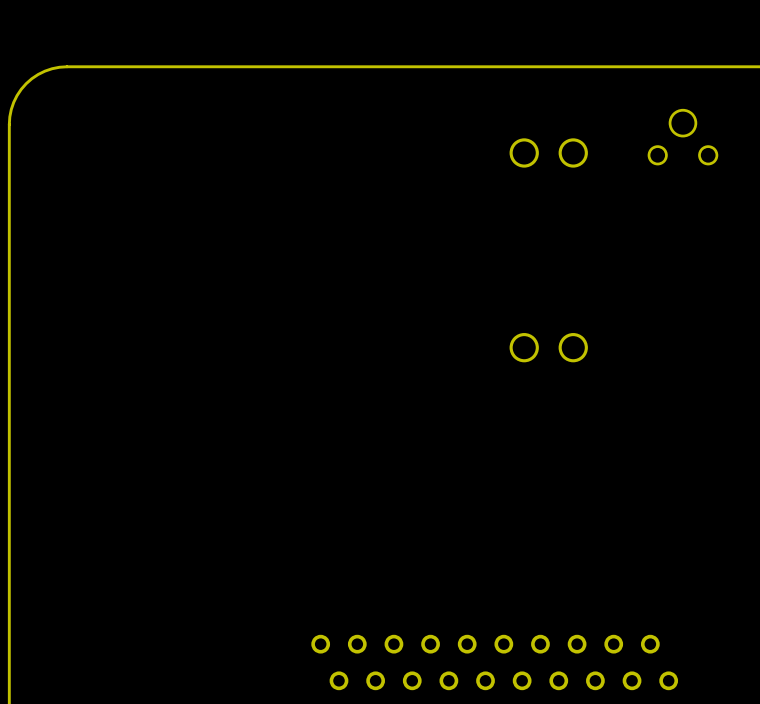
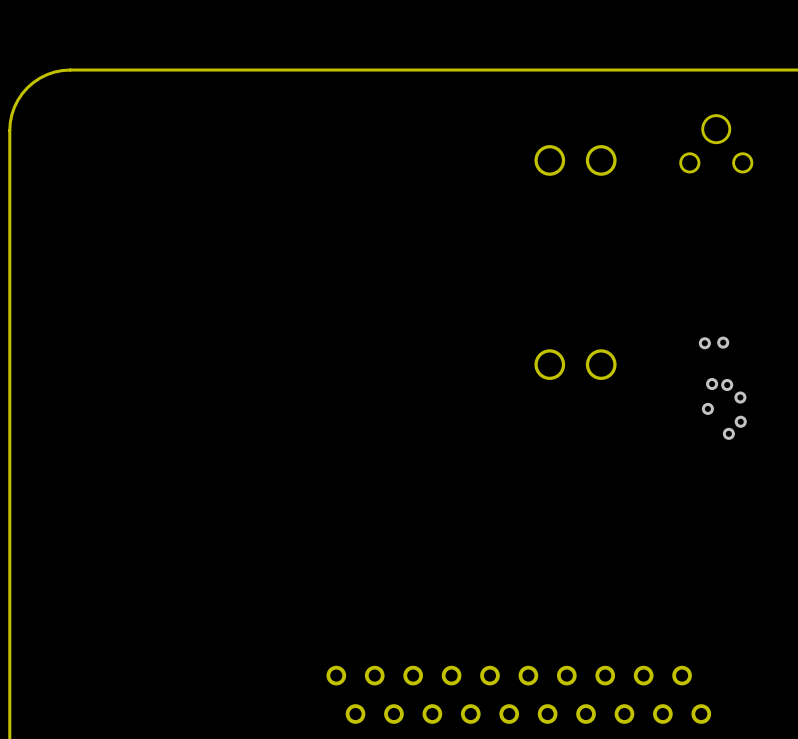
via: none -> (723, 342)
via: none -> (704, 343)
via: none -> (712, 384)
via: none -> (727, 385)
via: none -> (740, 397)
via: none -> (707, 408)
via: none -> (740, 421)
via: none -> (728, 433)

